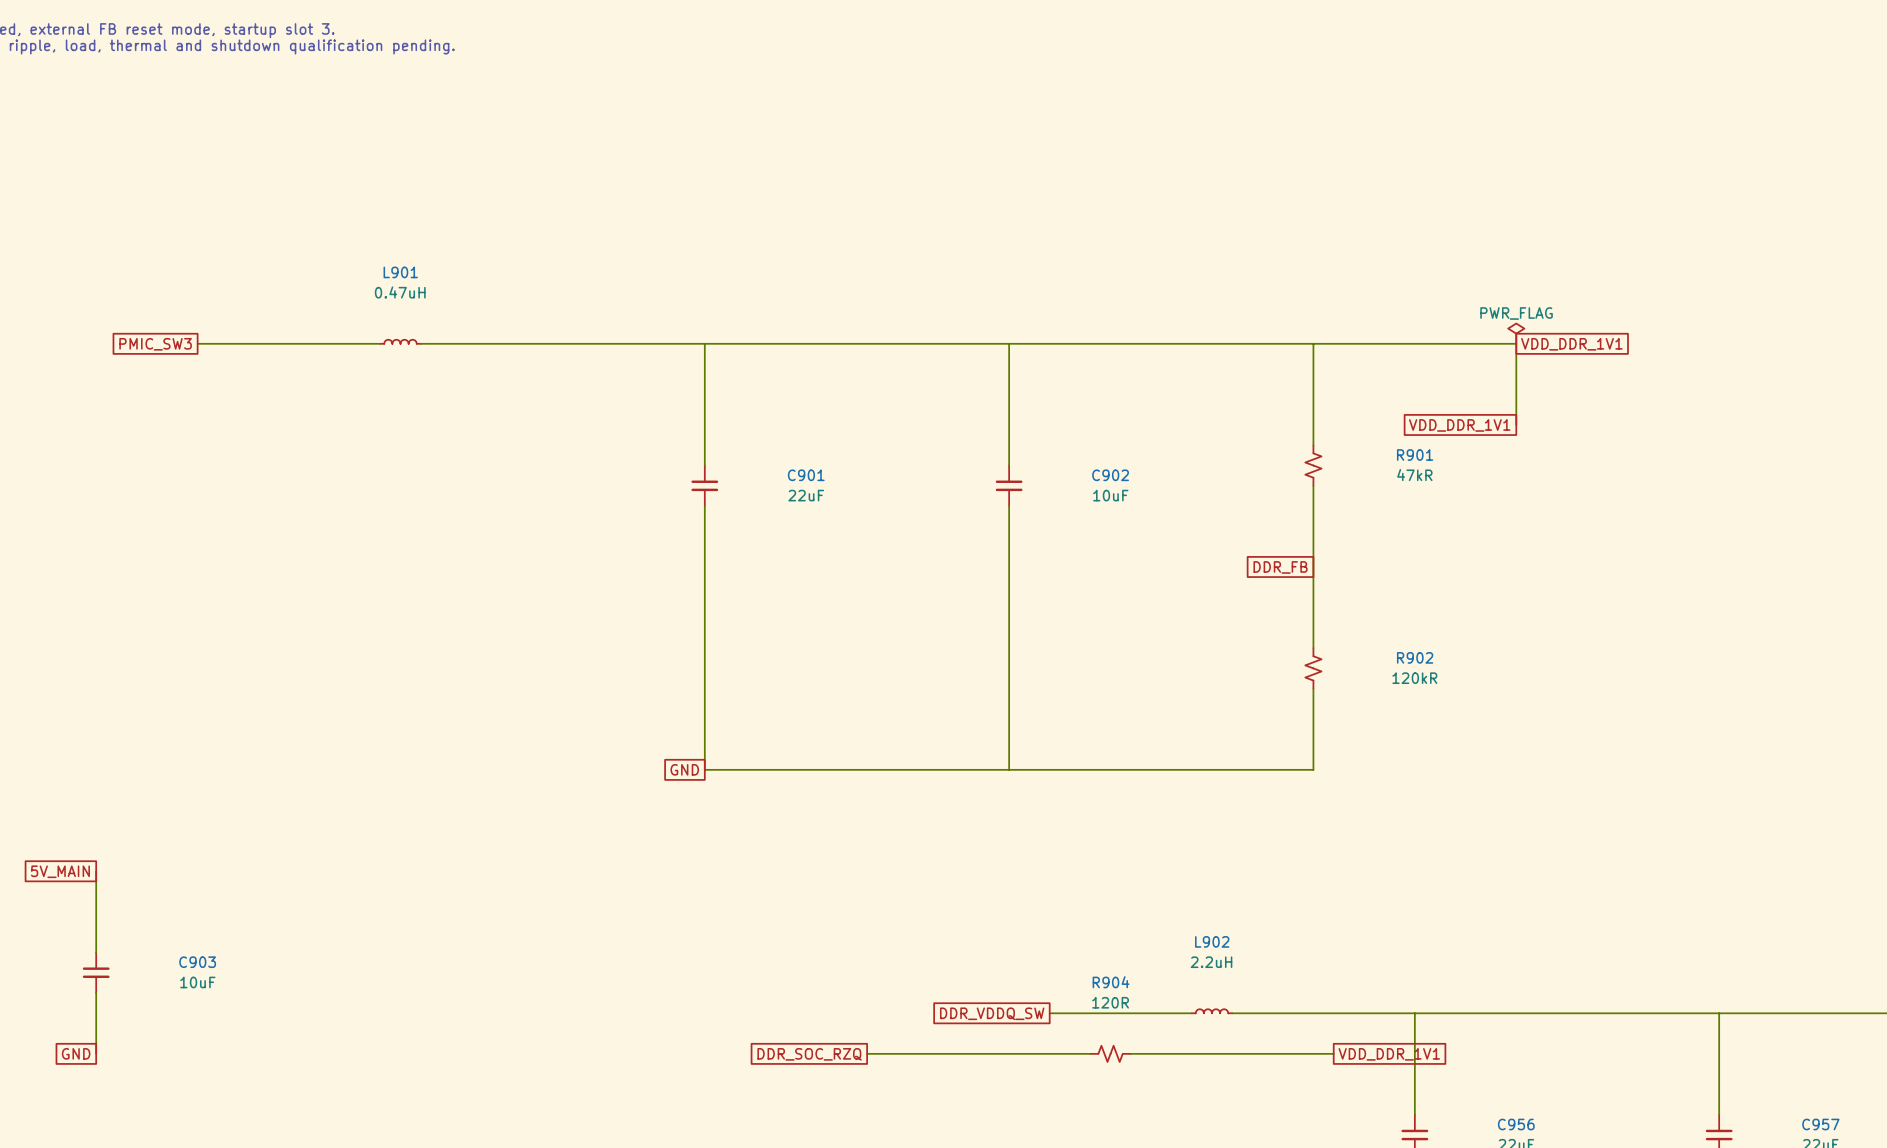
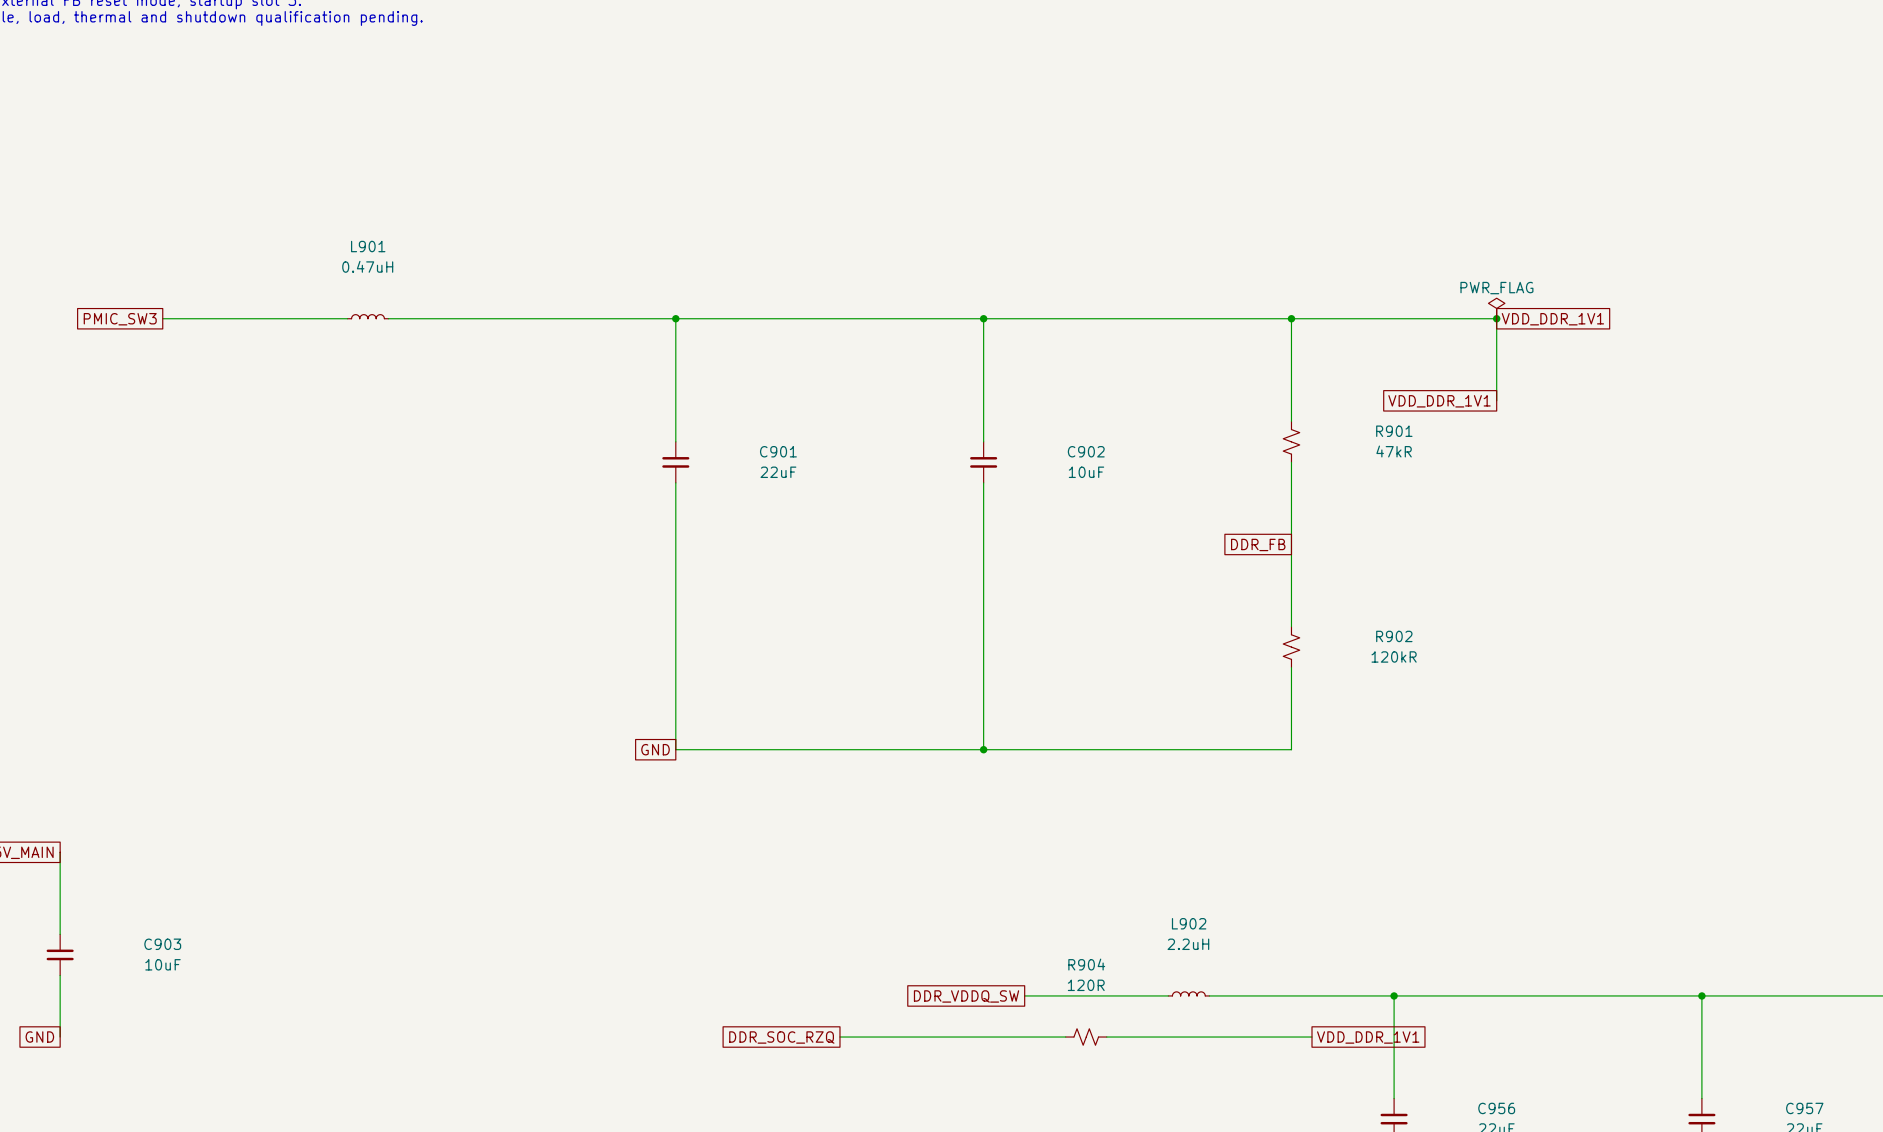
junction: none -> (675, 318)
junction: none -> (983, 318)
junction: none -> (1291, 318)
junction: none -> (1496, 318)
junction: none -> (983, 749)
junction: none -> (1394, 995)
junction: none -> (1701, 995)

